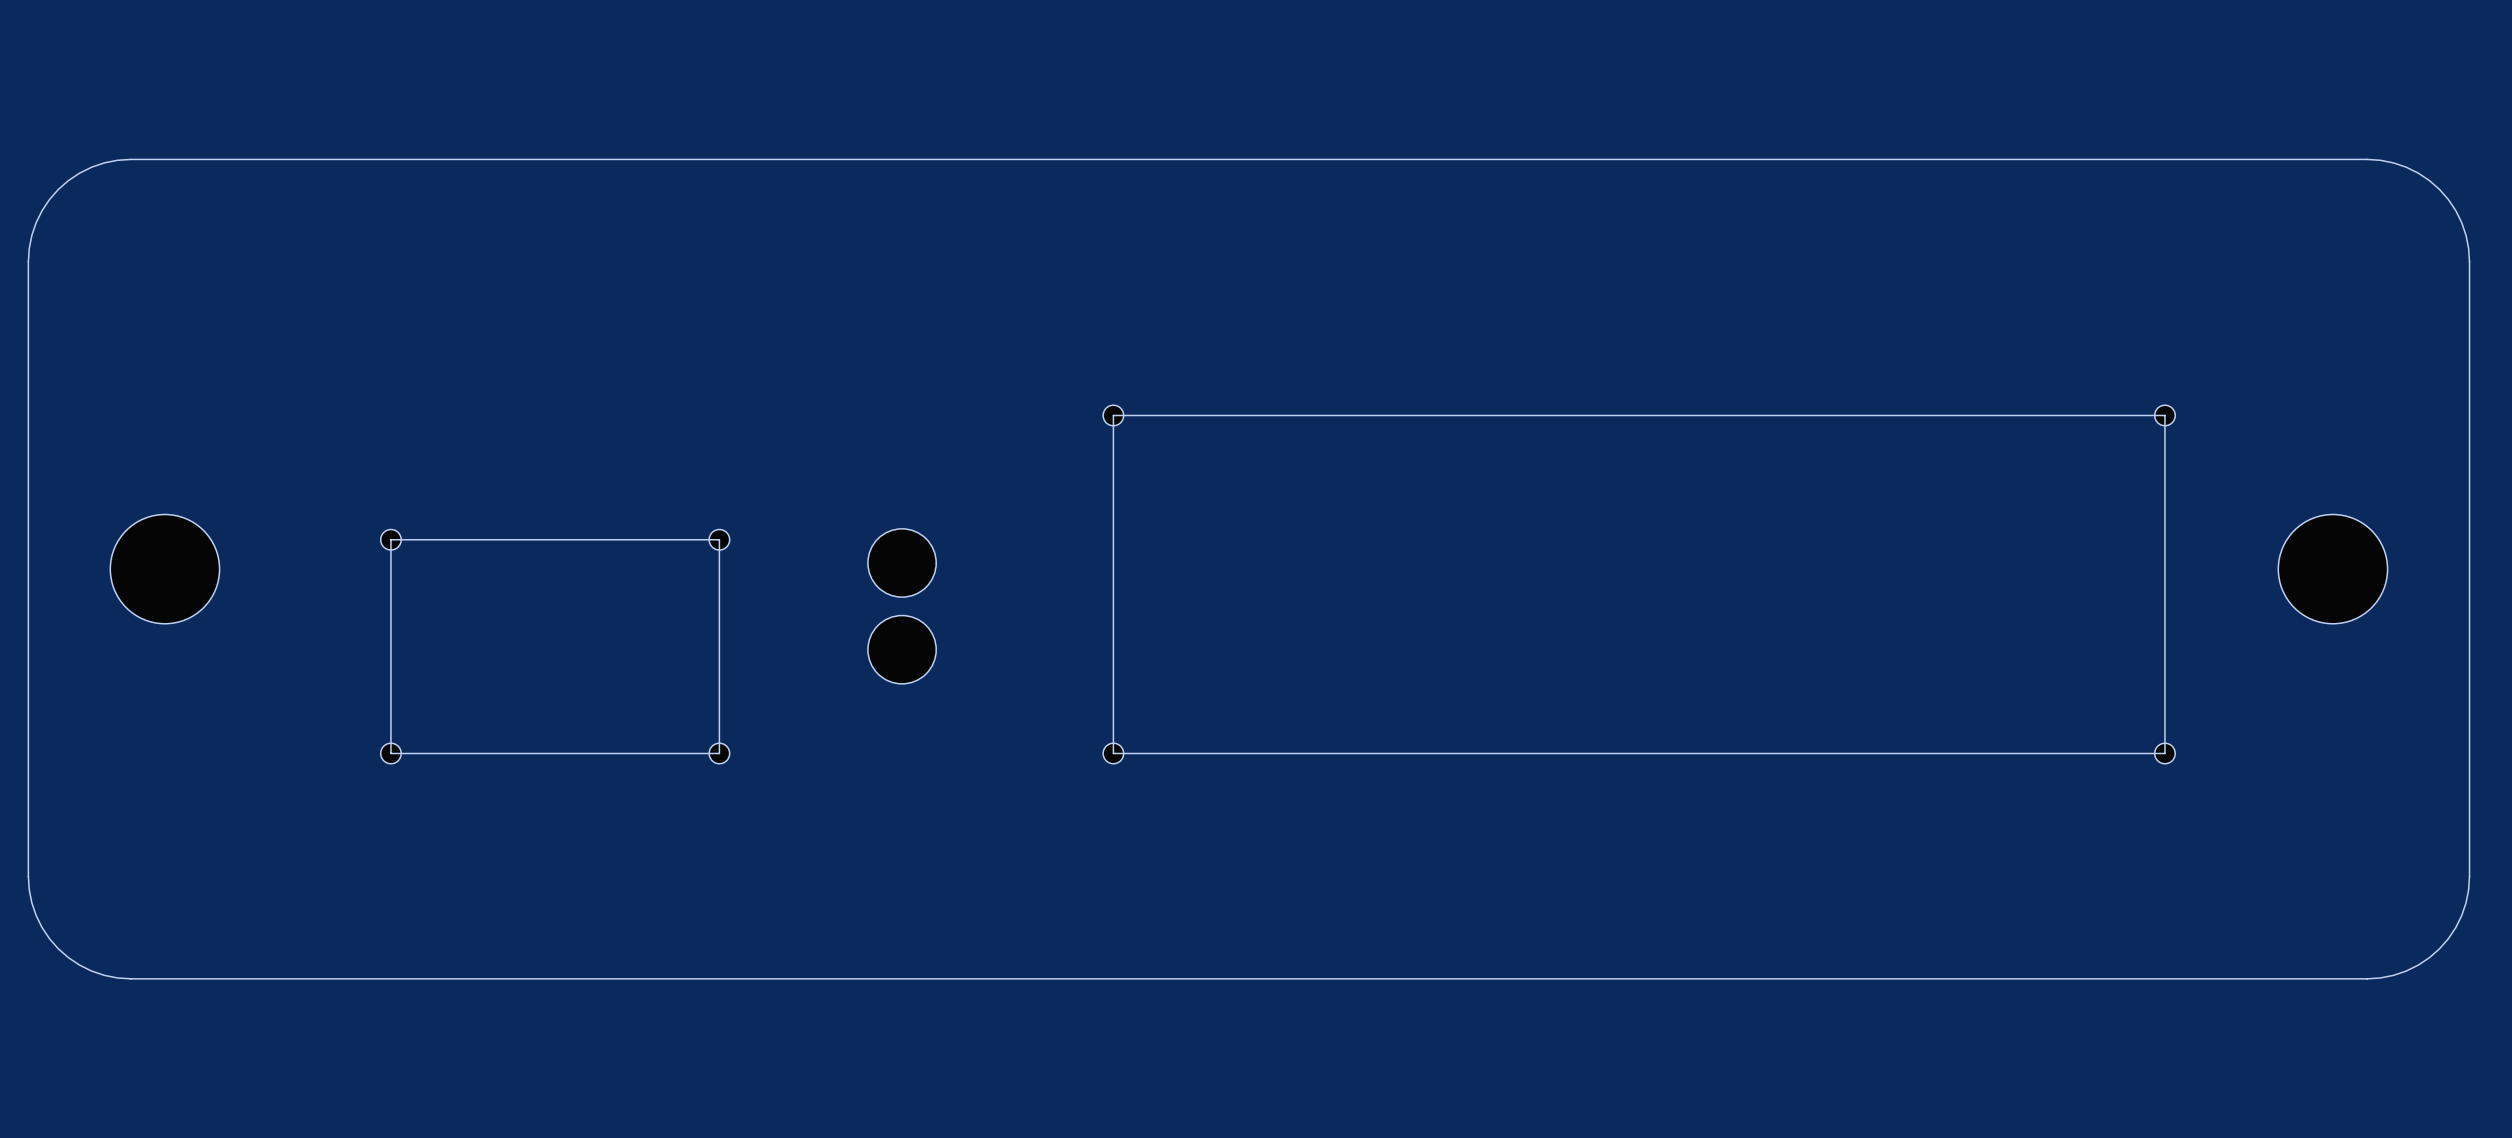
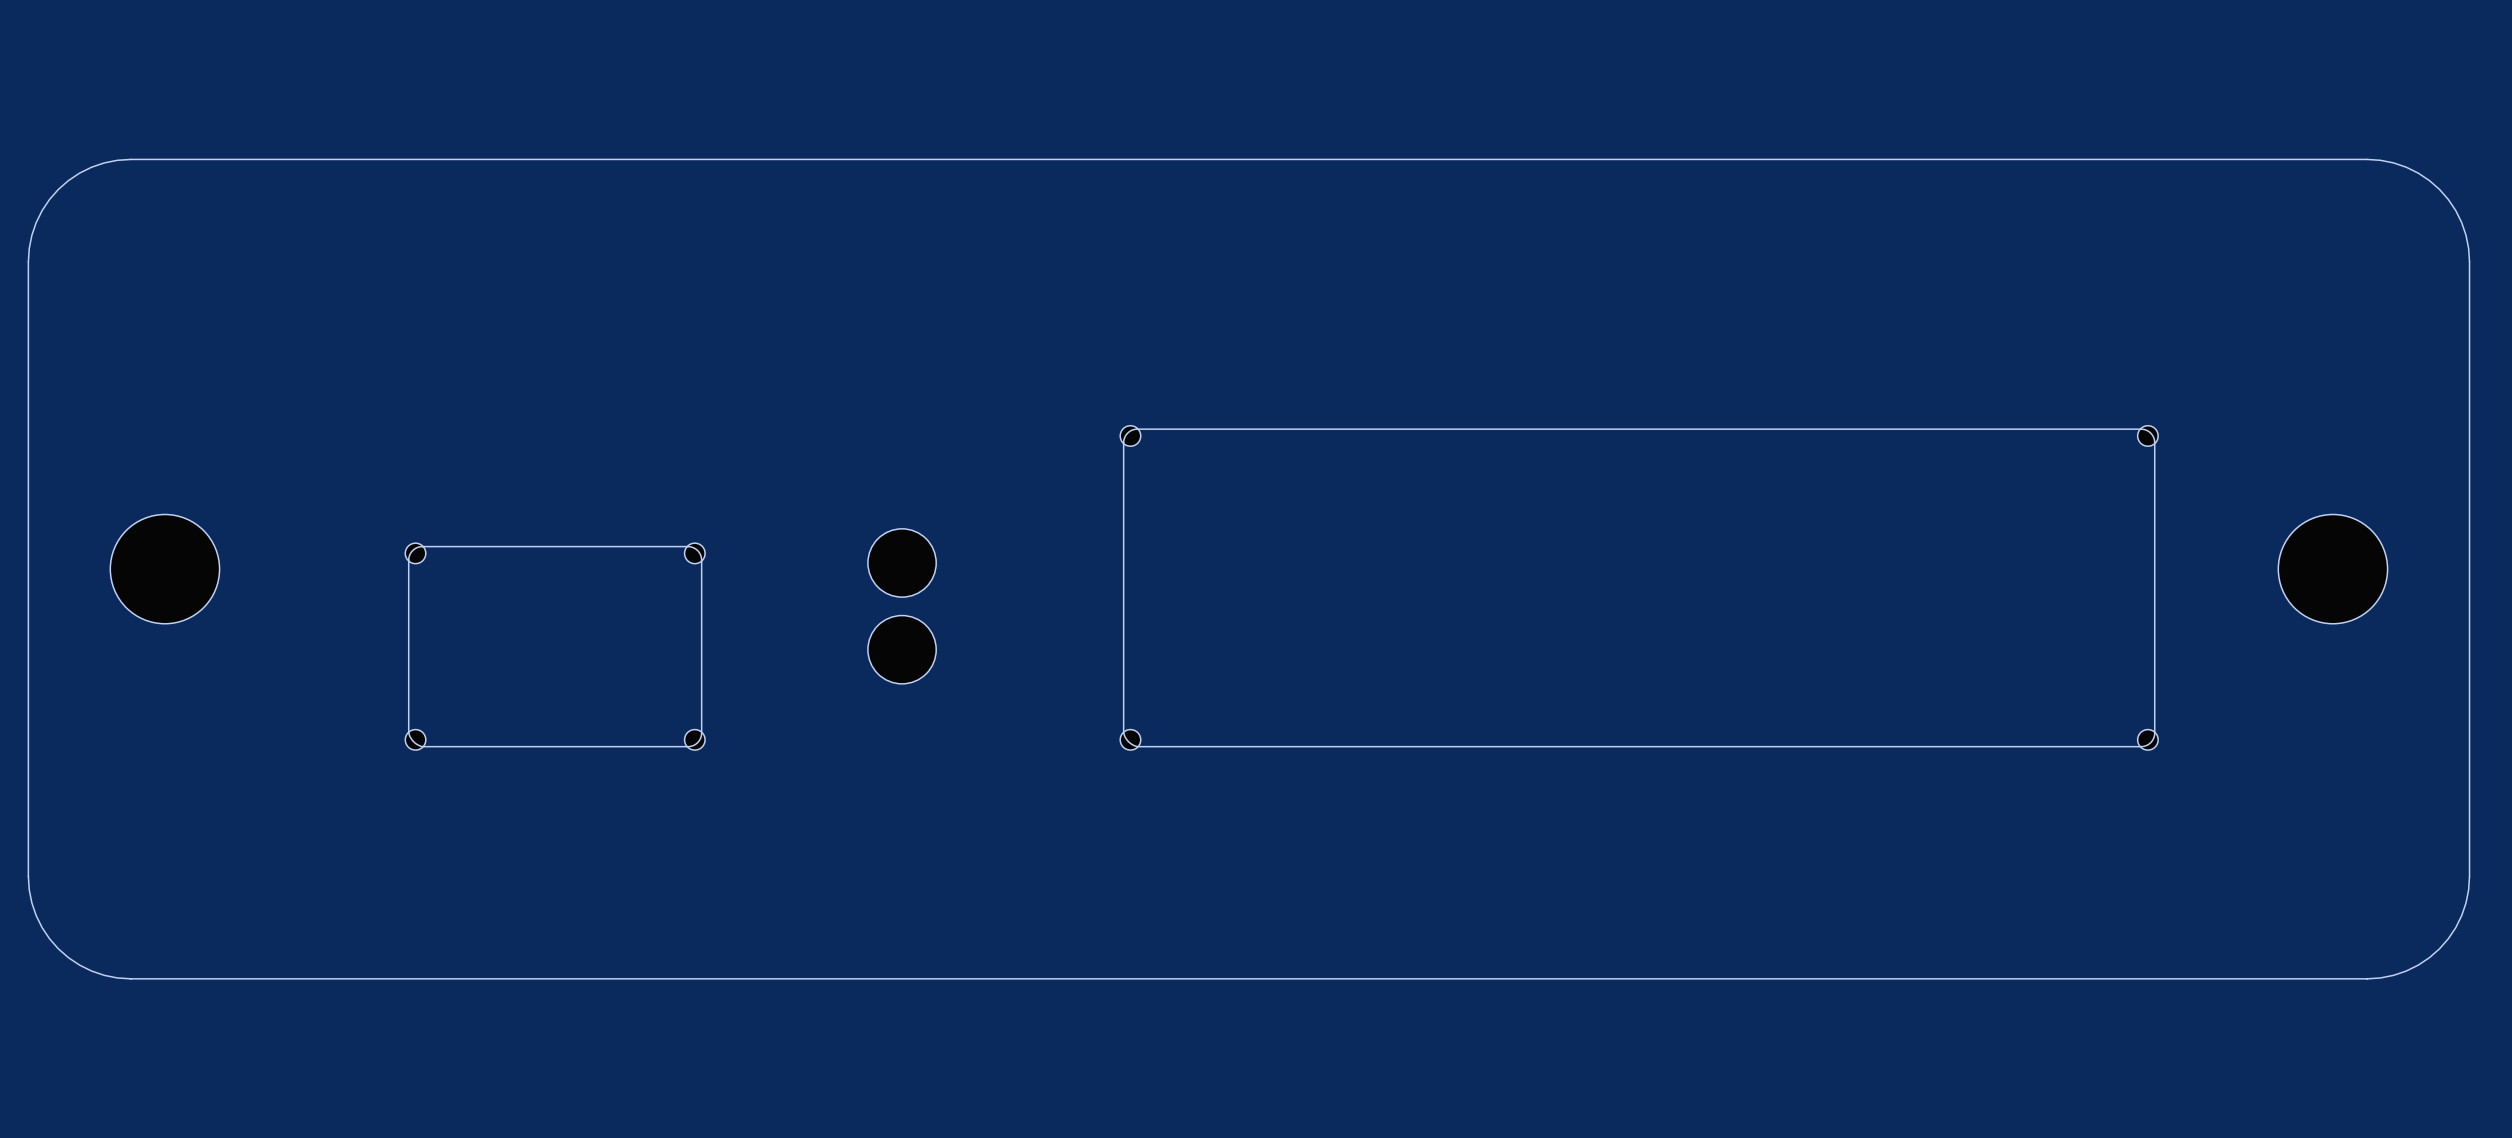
hole: (1113, 415) -> none
board edge: (2164, 415) (2164, 753) (1113, 753) (1113, 415) (2164, 415) -> none
hole: (2164, 415) -> none
hole: (390, 539) -> none
board edge: (719, 539) (719, 753) (390, 753) (390, 539) (719, 539) -> none
hole: (719, 539) -> none
part: none -> (1639, 587)
part: none -> (555, 646)
hole: (390, 753) -> none
hole: (719, 753) -> none
hole: (1113, 753) -> none
hole: (2164, 753) -> none

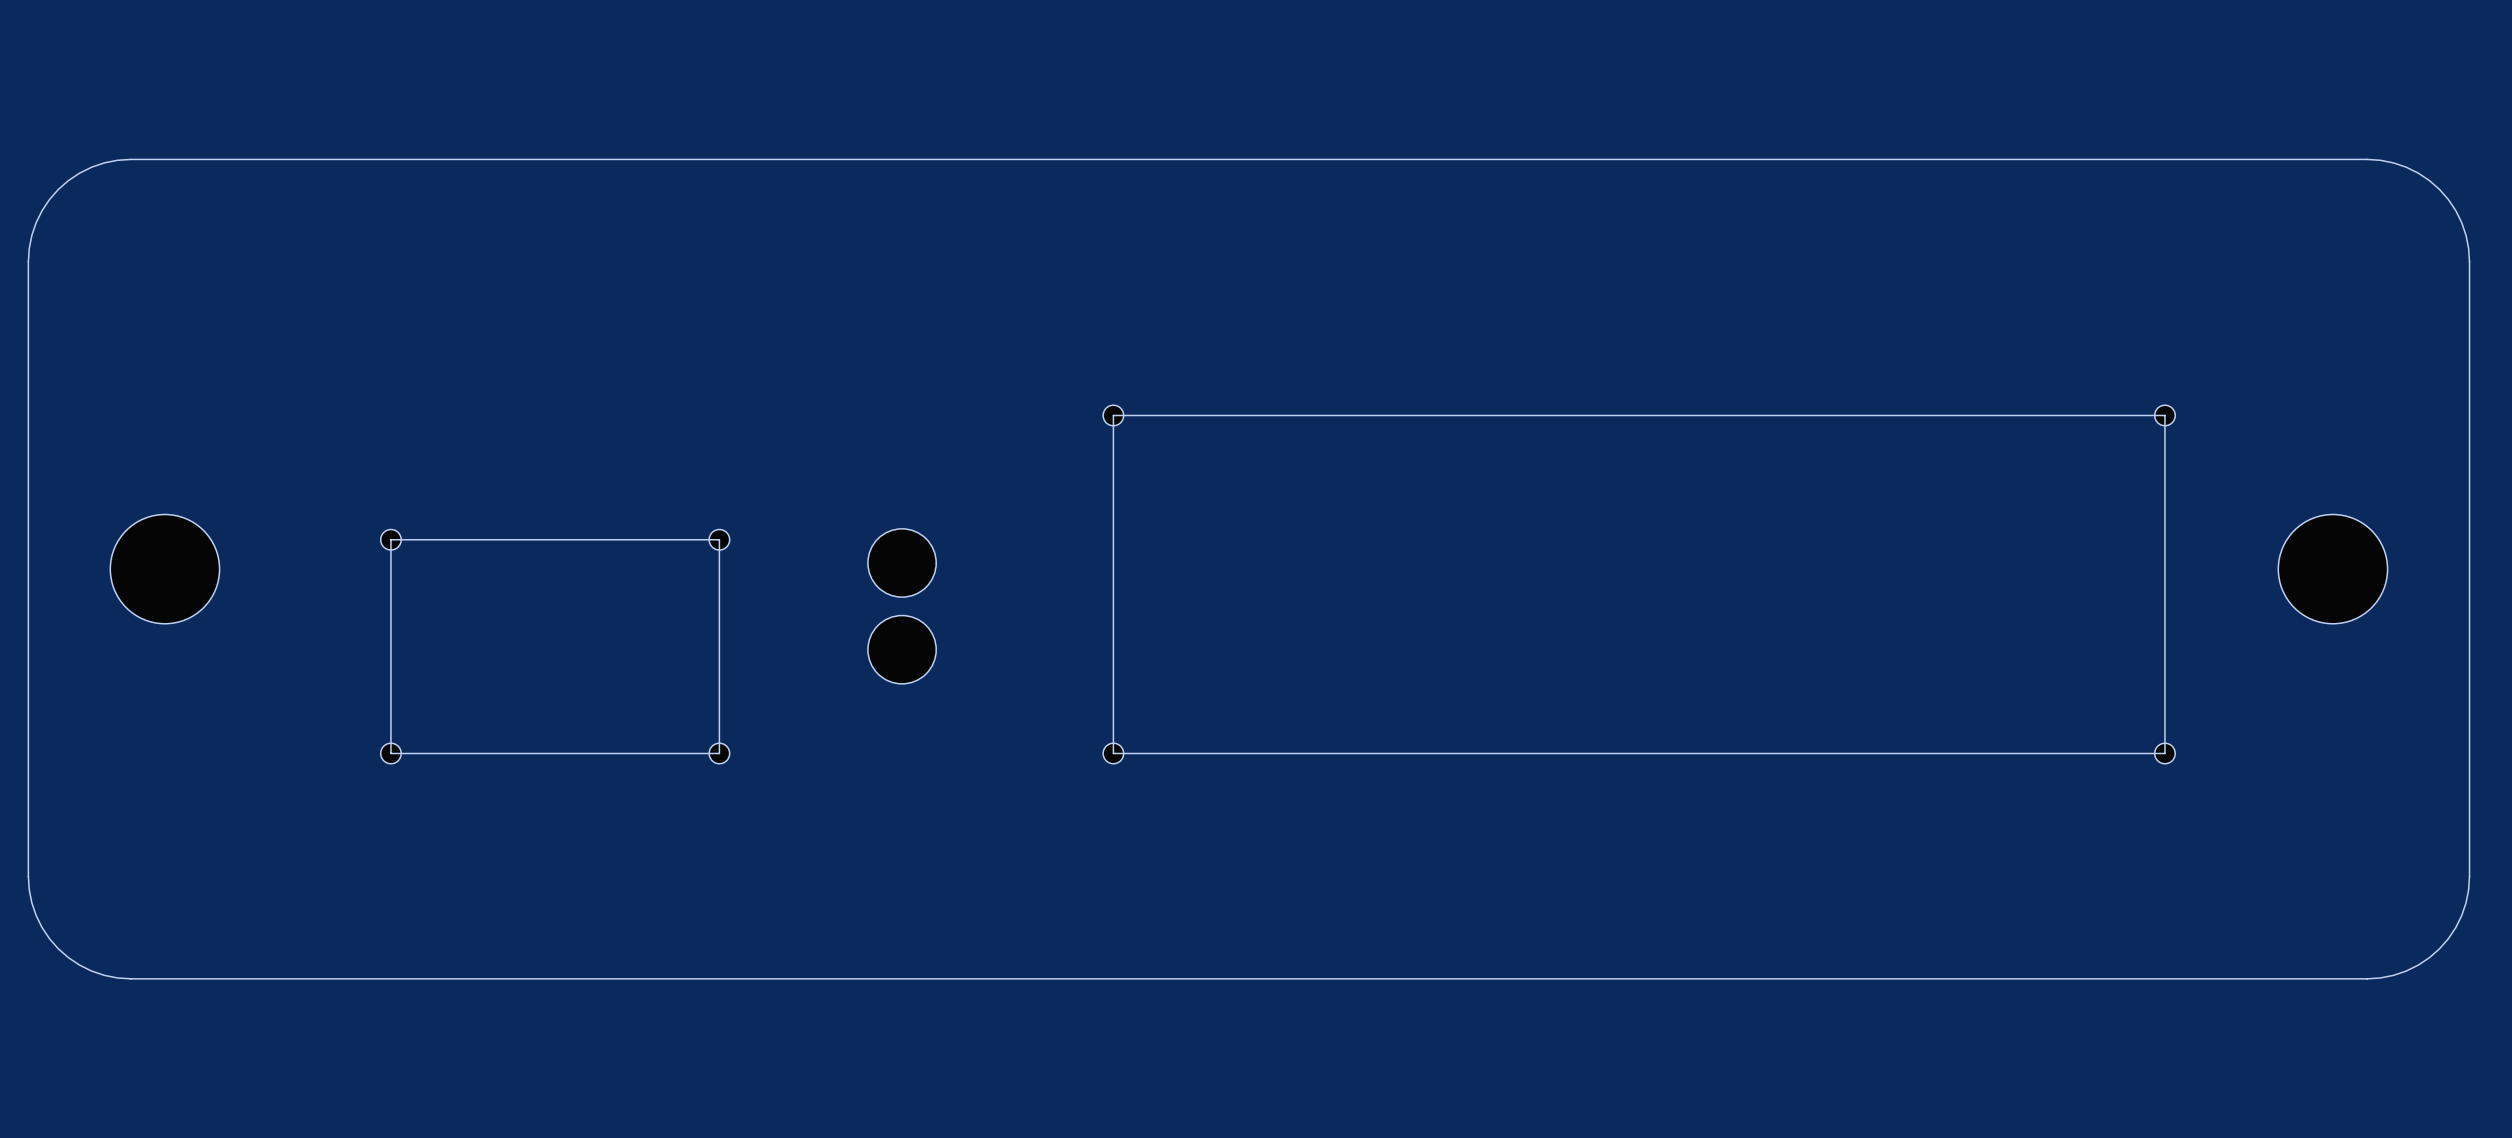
hole: none -> (1113, 415)
board edge: none -> (2164, 415) (2164, 753) (1113, 753) (1113, 415) (2164, 415)
hole: none -> (2164, 415)
hole: none -> (390, 539)
board edge: none -> (719, 539) (719, 753) (390, 753) (390, 539) (719, 539)
hole: none -> (719, 539)
part: (1639, 587) -> none
part: (555, 646) -> none
hole: none -> (390, 753)
hole: none -> (719, 753)
hole: none -> (1113, 753)
hole: none -> (2164, 753)

